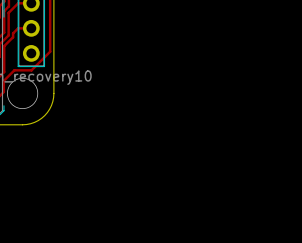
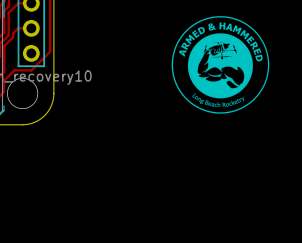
drawing: none -> [171, 16, 270, 114]

